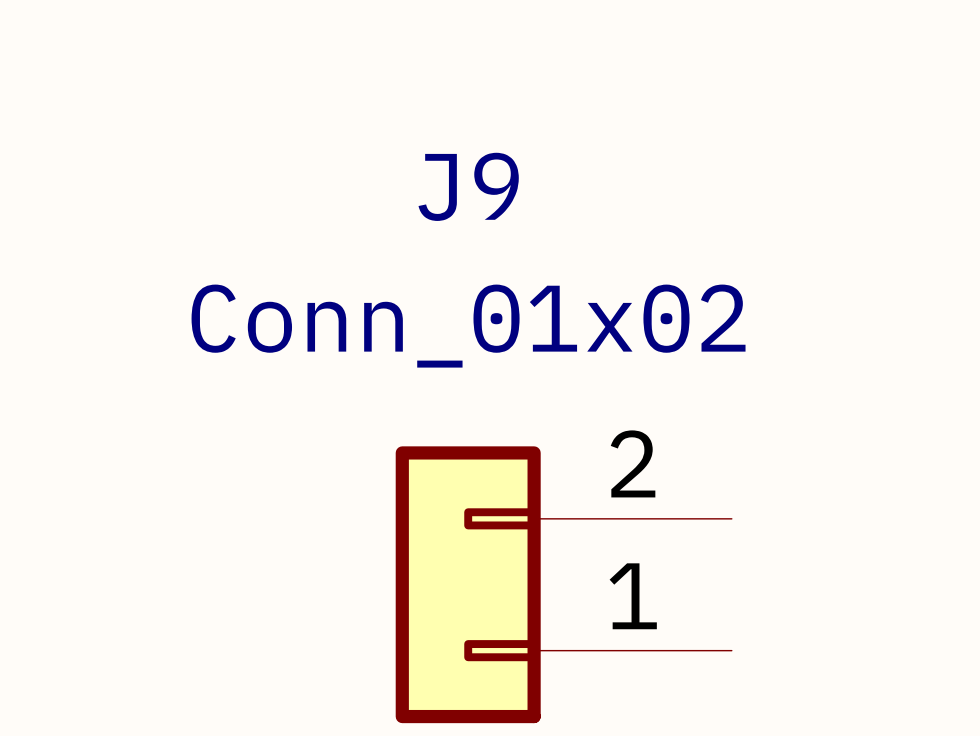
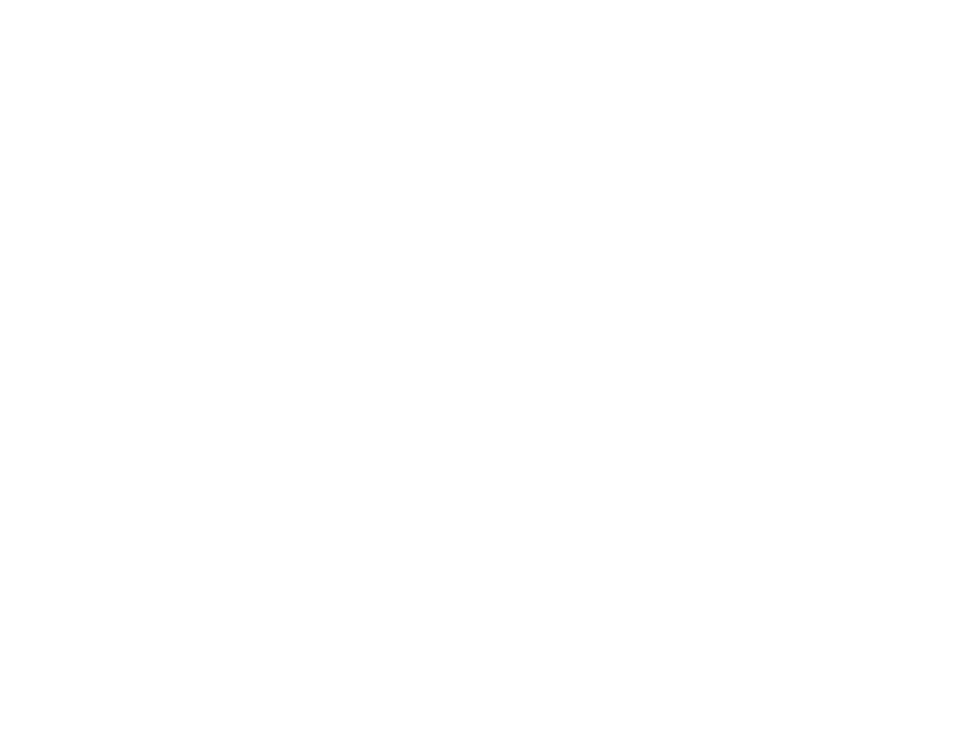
J9: Conn_01x02 (563, 584) -> none

